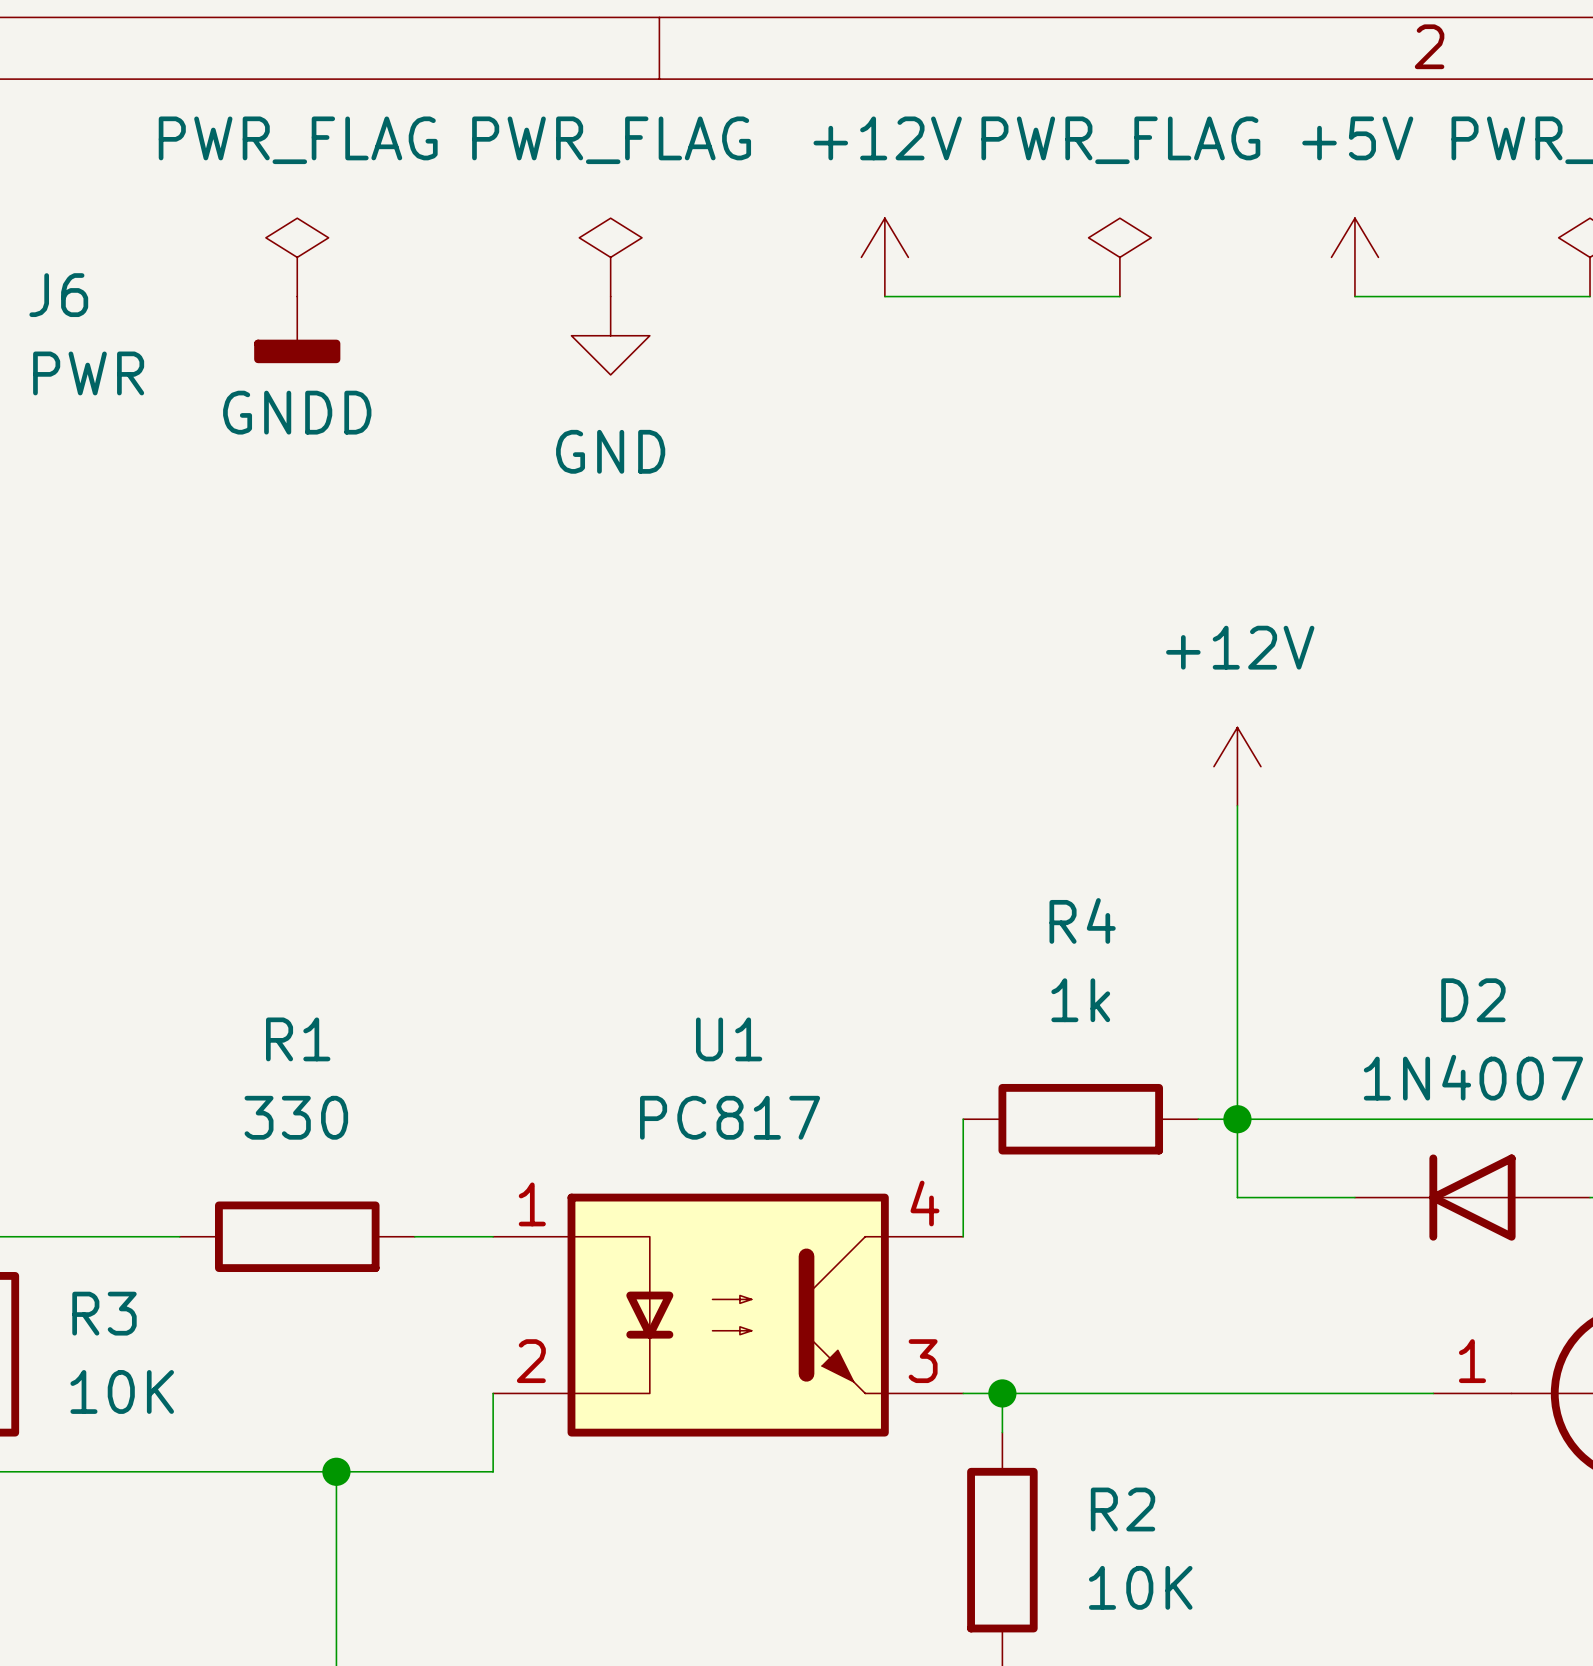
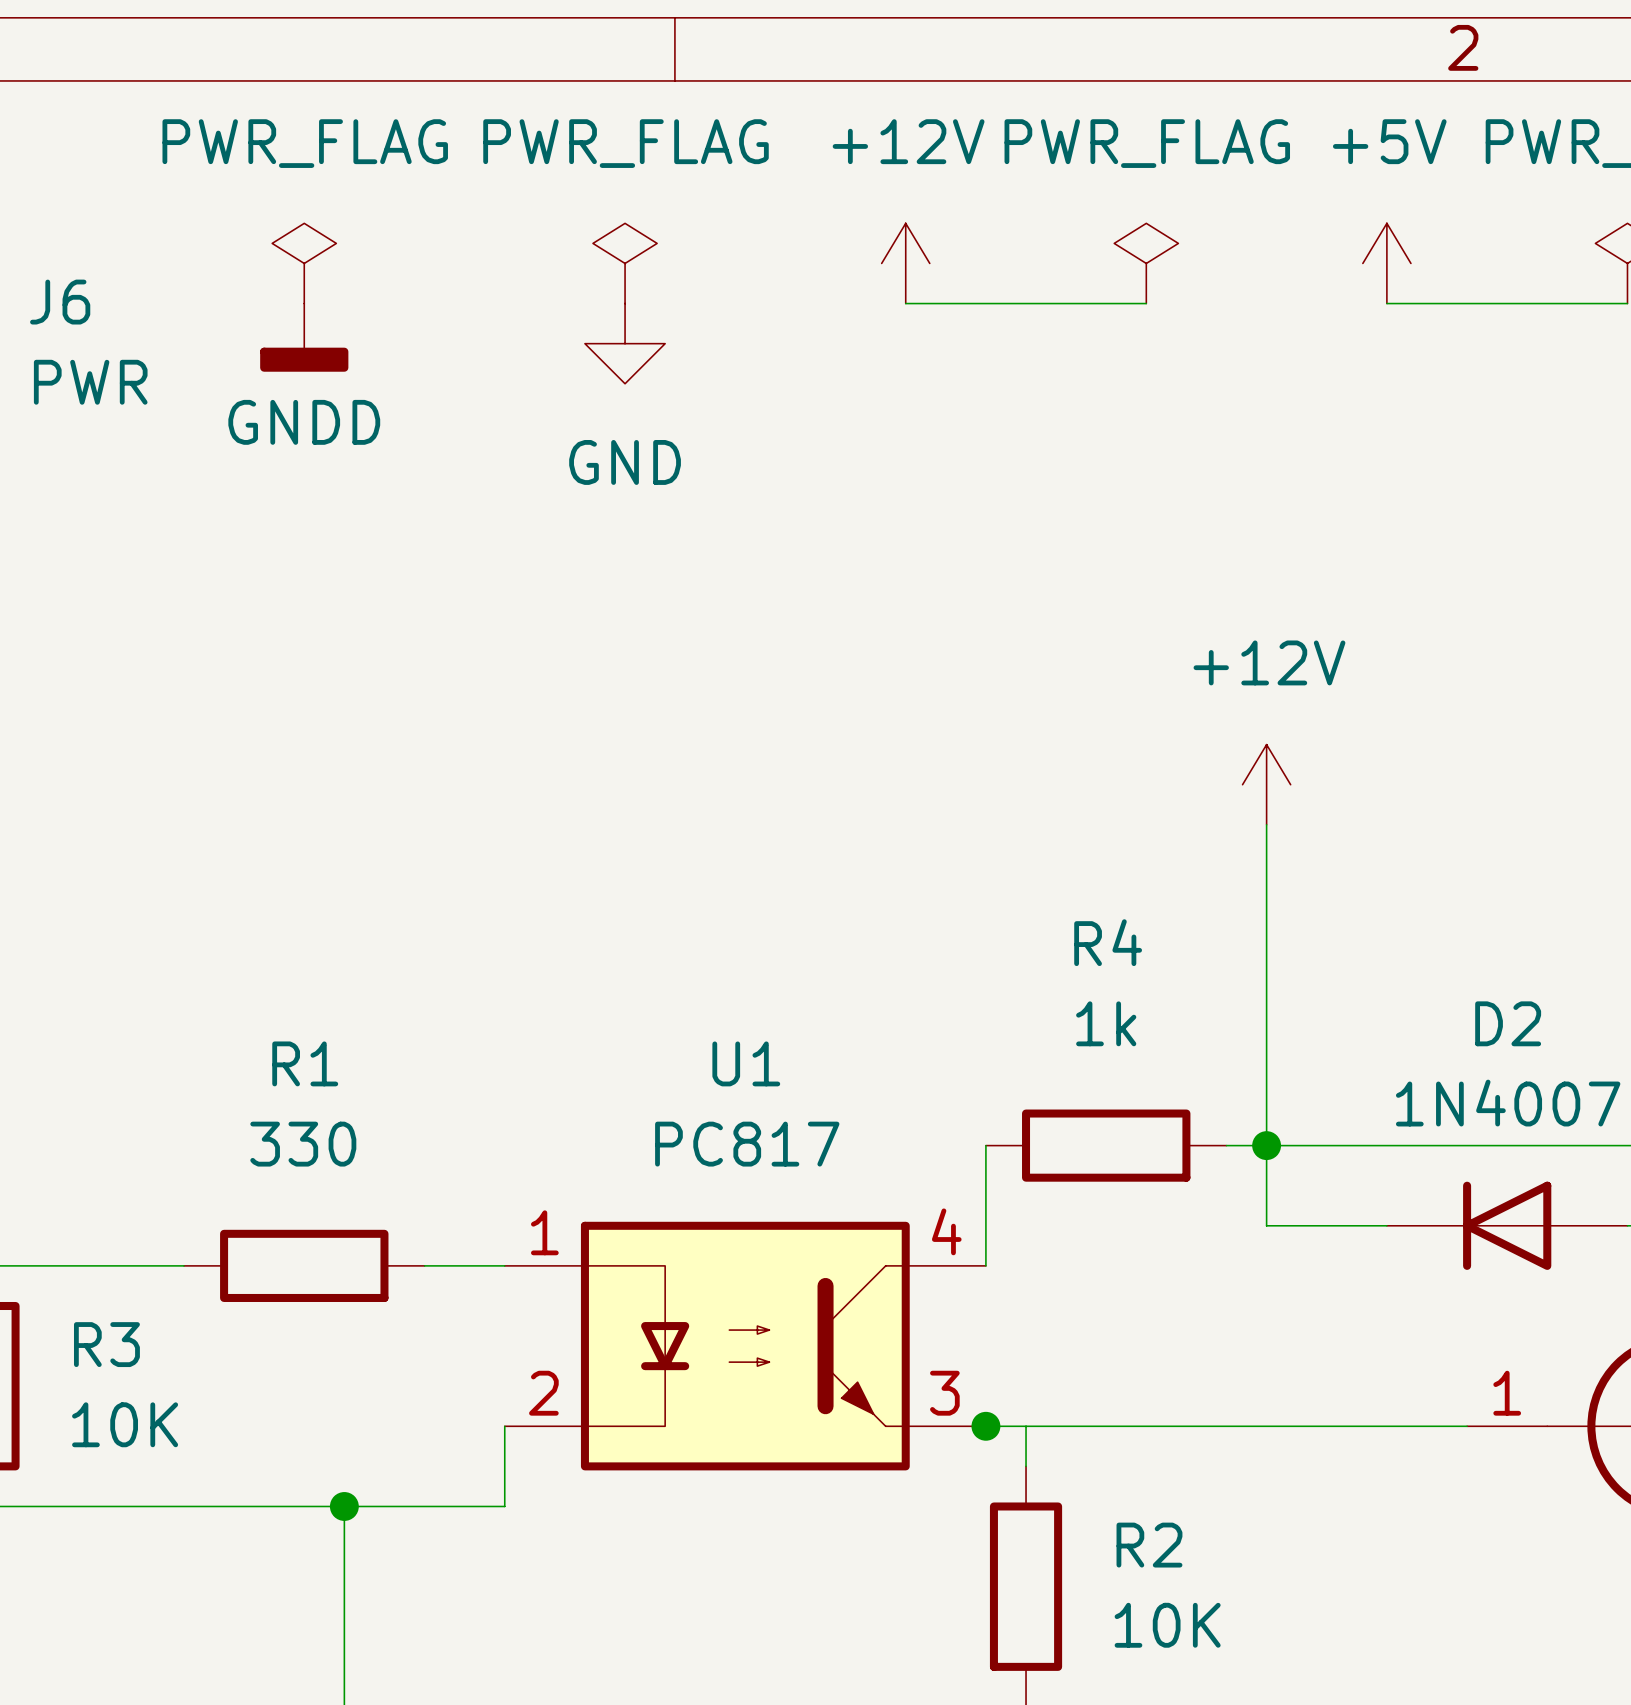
junction position: (1002, 1393) -> (985, 1426)

